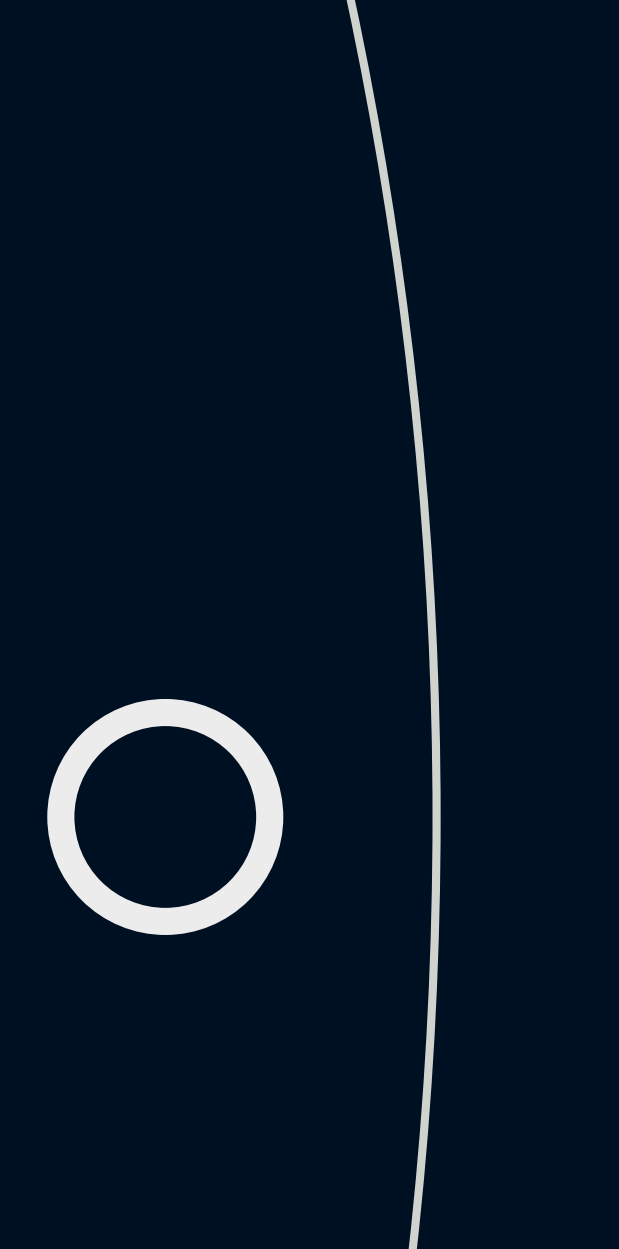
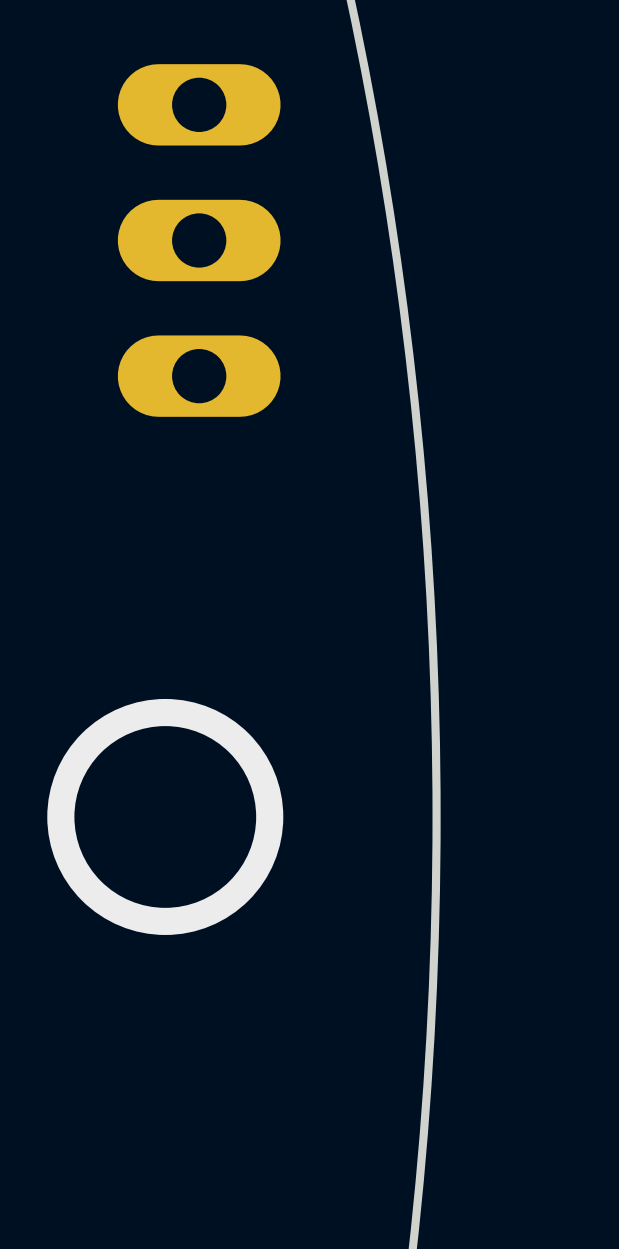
part: none -> (199, 240)

